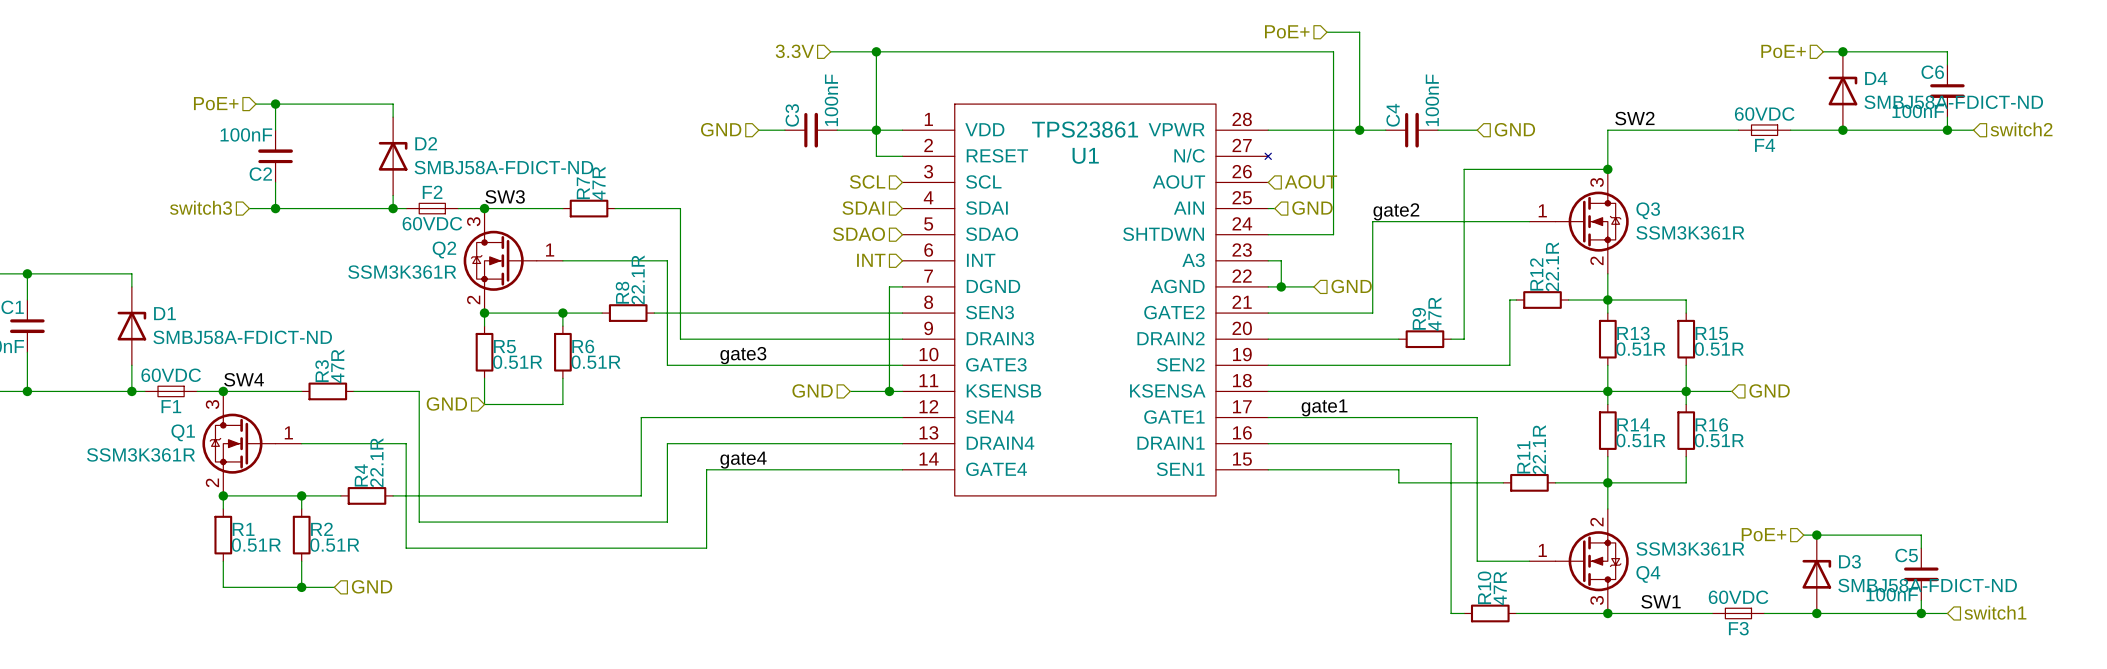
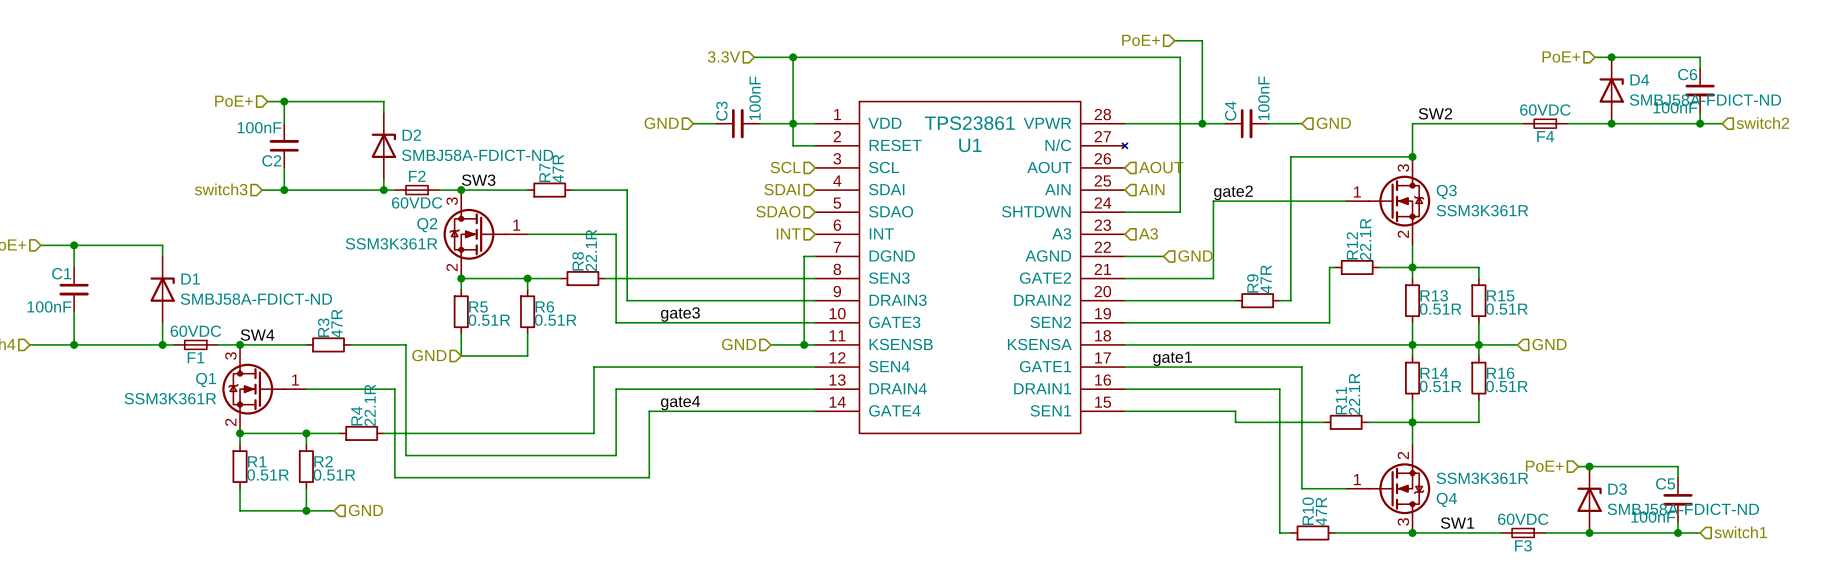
wire: (1268, 208) (1274, 208) -> none
hierarchical label: GND (1312, 208) -> AIN (1151, 189)
wire: (1268, 260) (1281, 260) (1281, 286) -> none
hierarchical label: none -> A3 (1148, 233)
junction: (1281, 286) -> none

